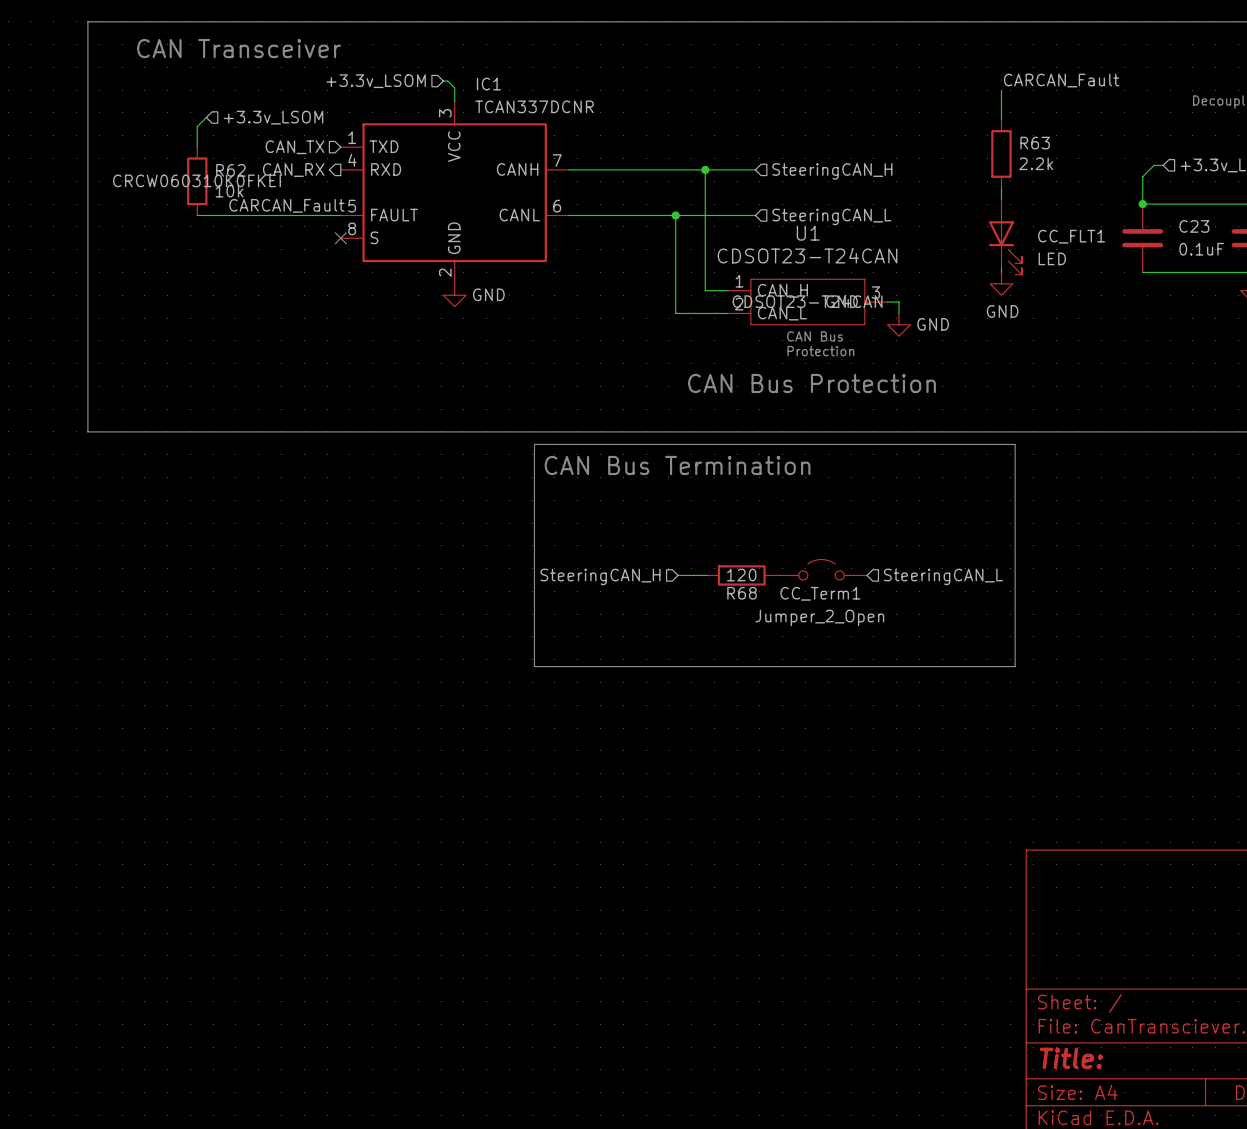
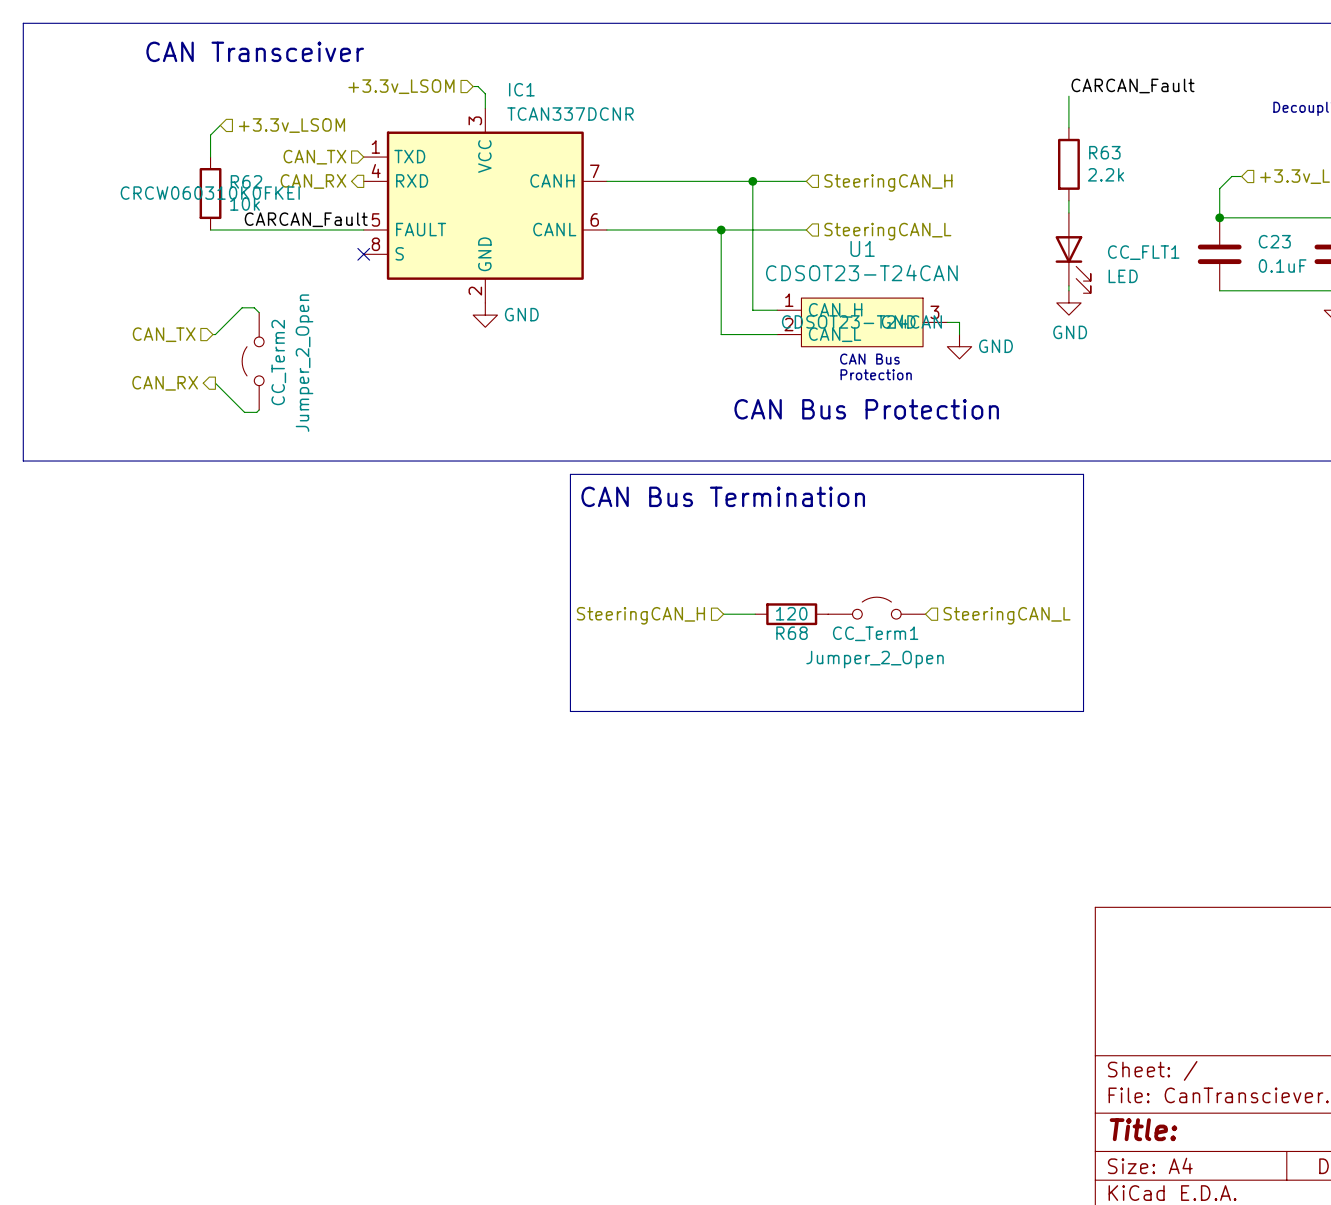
line: (87, 21) (87, 431) -> (93, 23) (23, 23) (23, 461) (93, 461)
wire: none -> (259, 312) (254, 307) (242, 307) (215, 334) (212, 334)
hierarchical label: none -> CAN_TX (164, 334)
CC_Term2: none -> Jumper_2_Open (253, 361)
hierarchical label: none -> CAN_RX (165, 383)
wire: none -> (215, 383) (244, 412) (256, 412) (259, 409)

